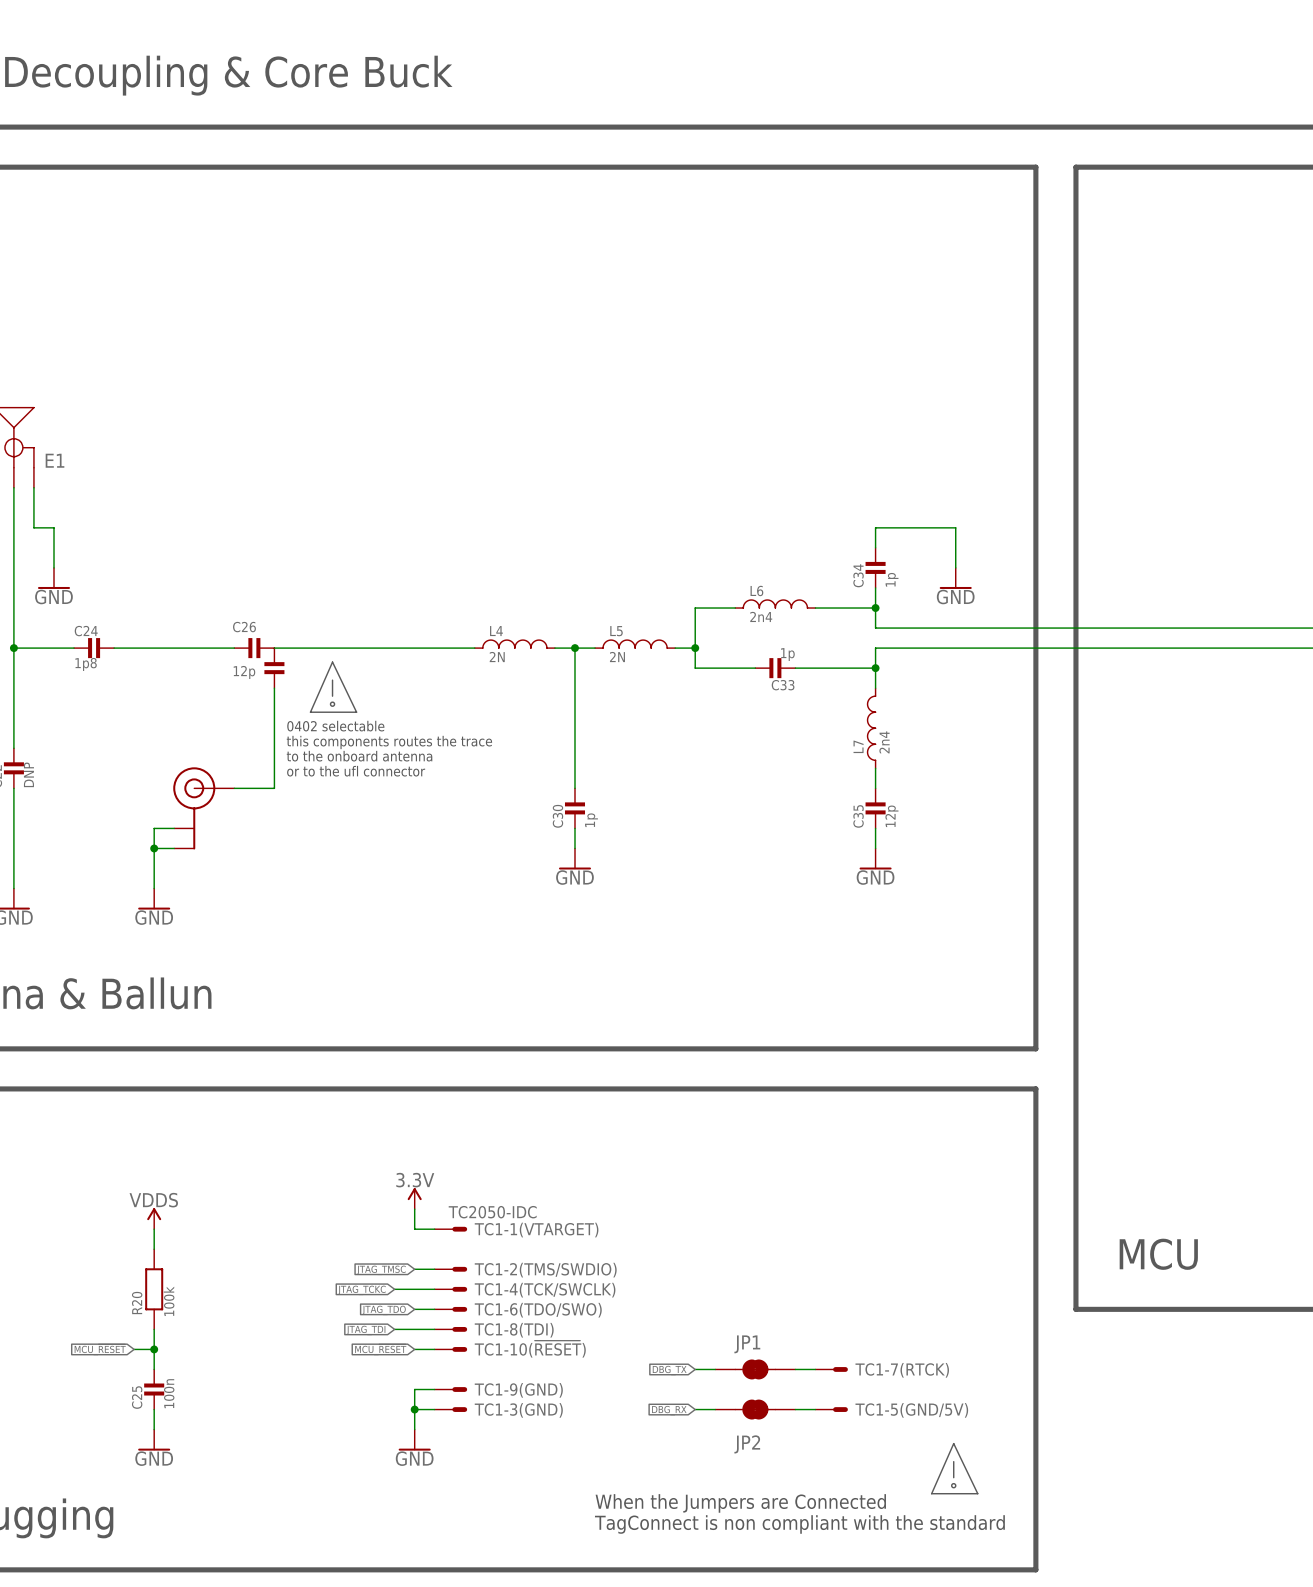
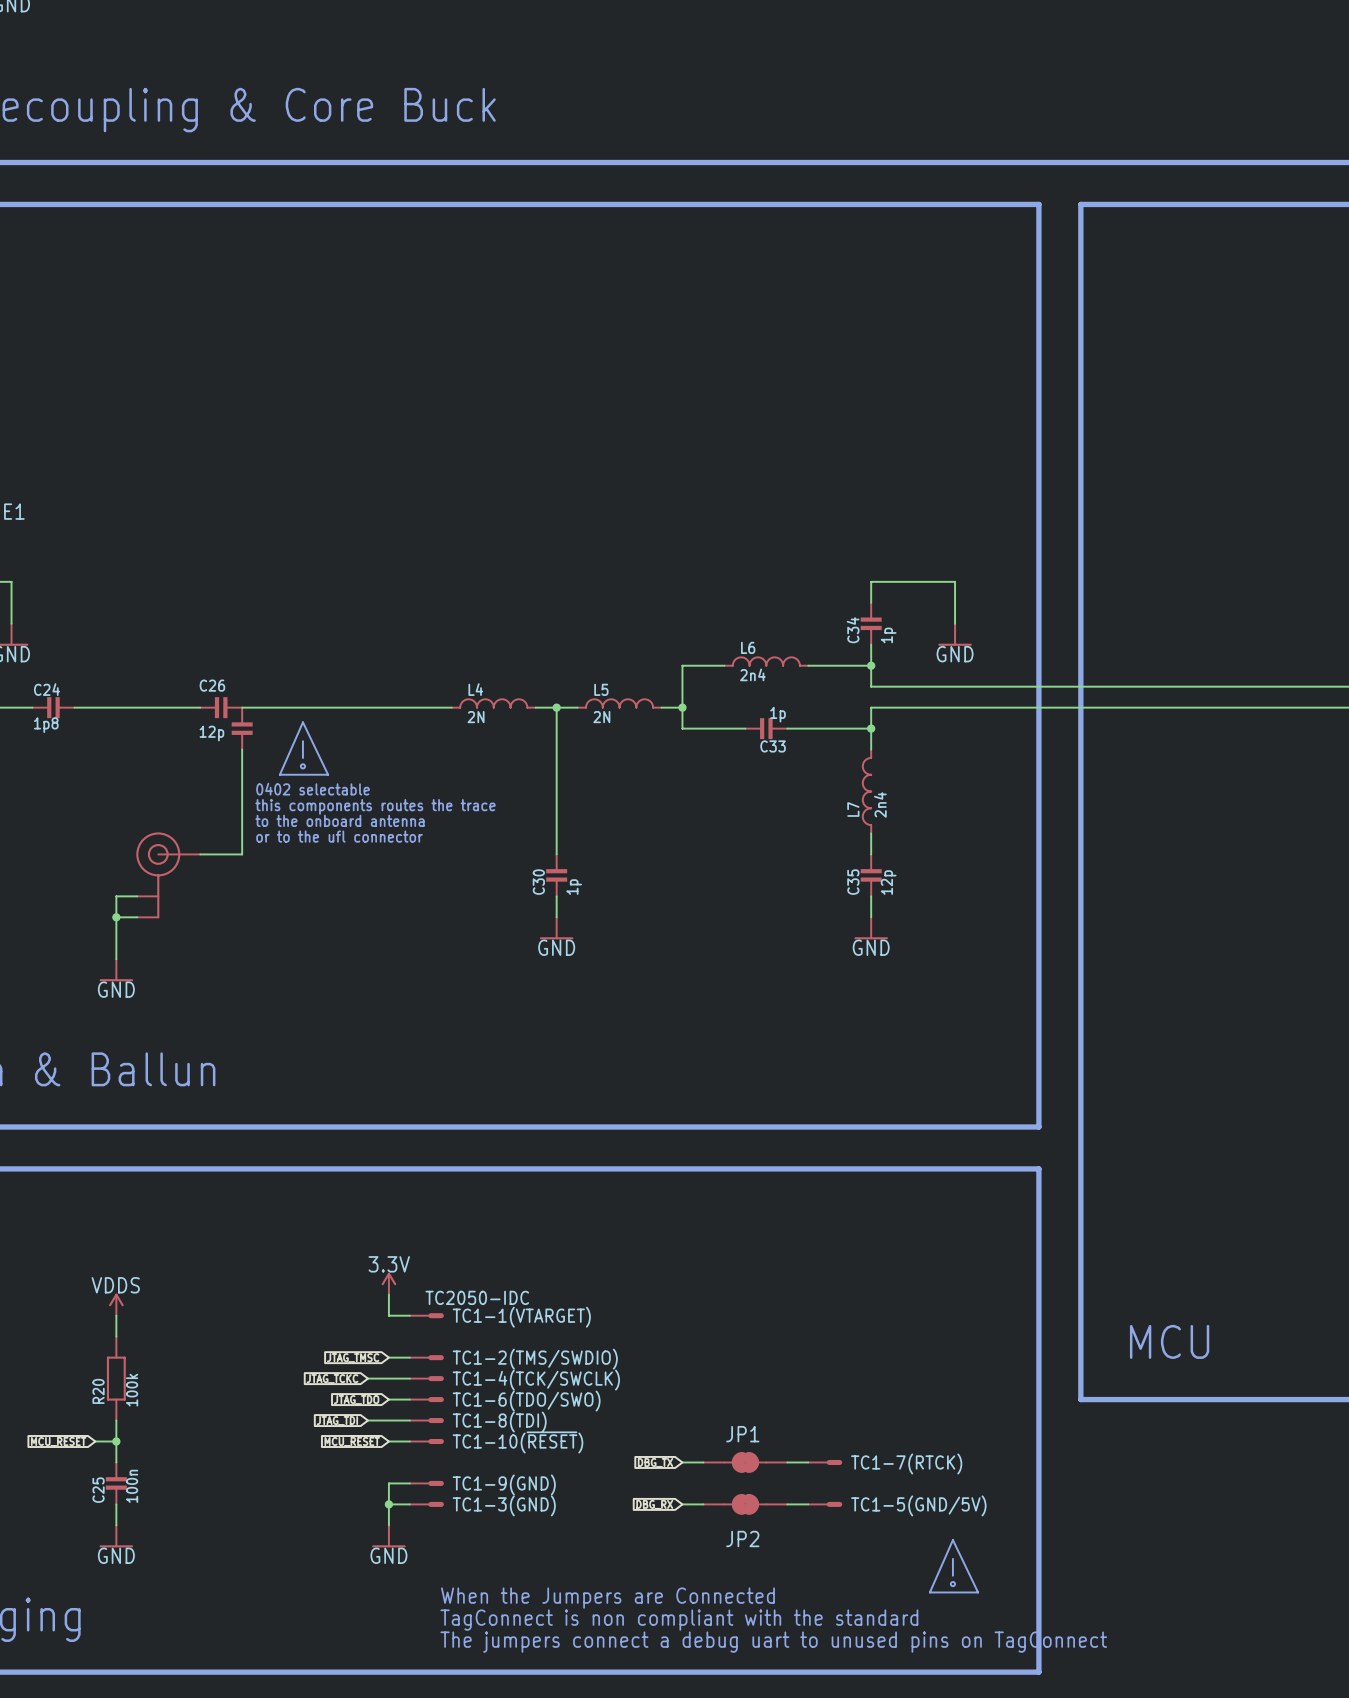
text position: When the Jumpers are Connected (740, 1503) -> When the Jumpers are Connected (607, 1598)
text position: TagConnect is non compliant with the standard (799, 1524) -> TagConnect is non compliant with the standard (679, 1620)
text: none -> The jumpers connect a debug uart to unused pins on TagConnect (773, 1642)

